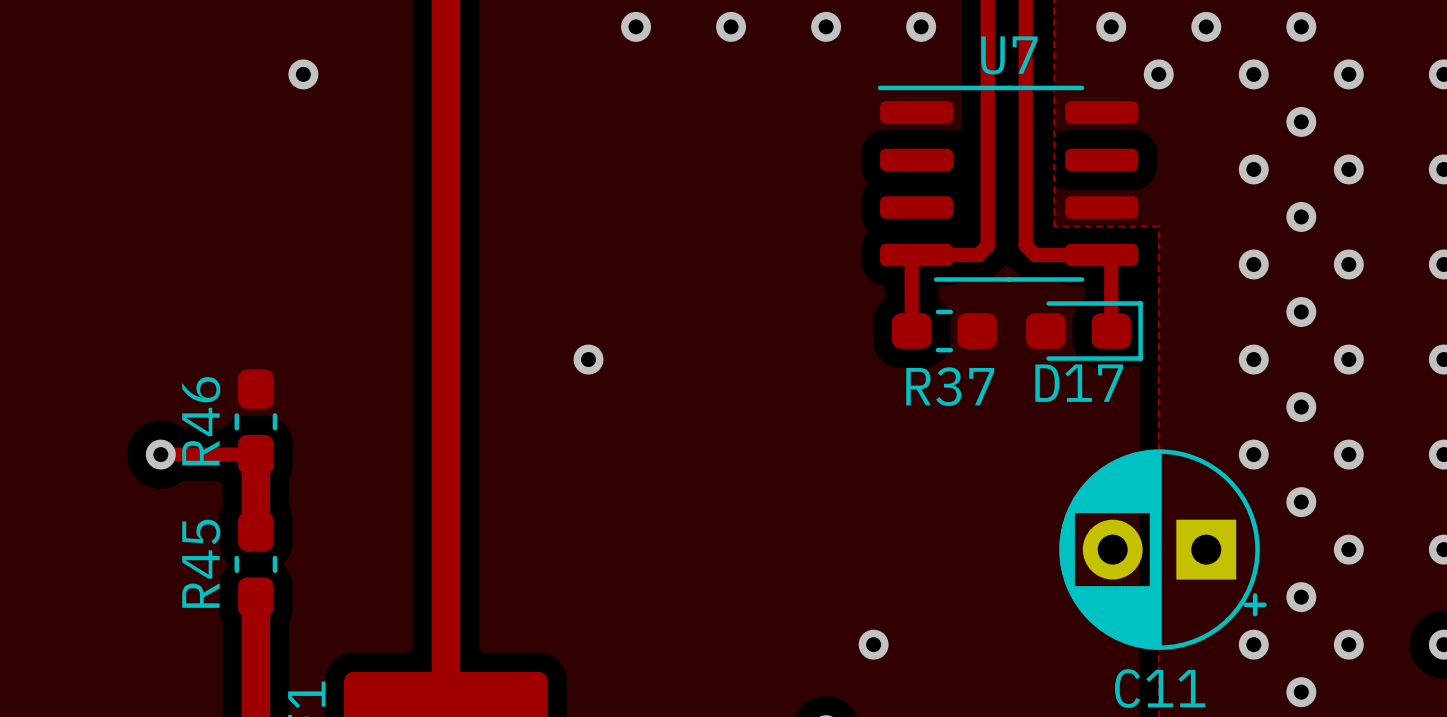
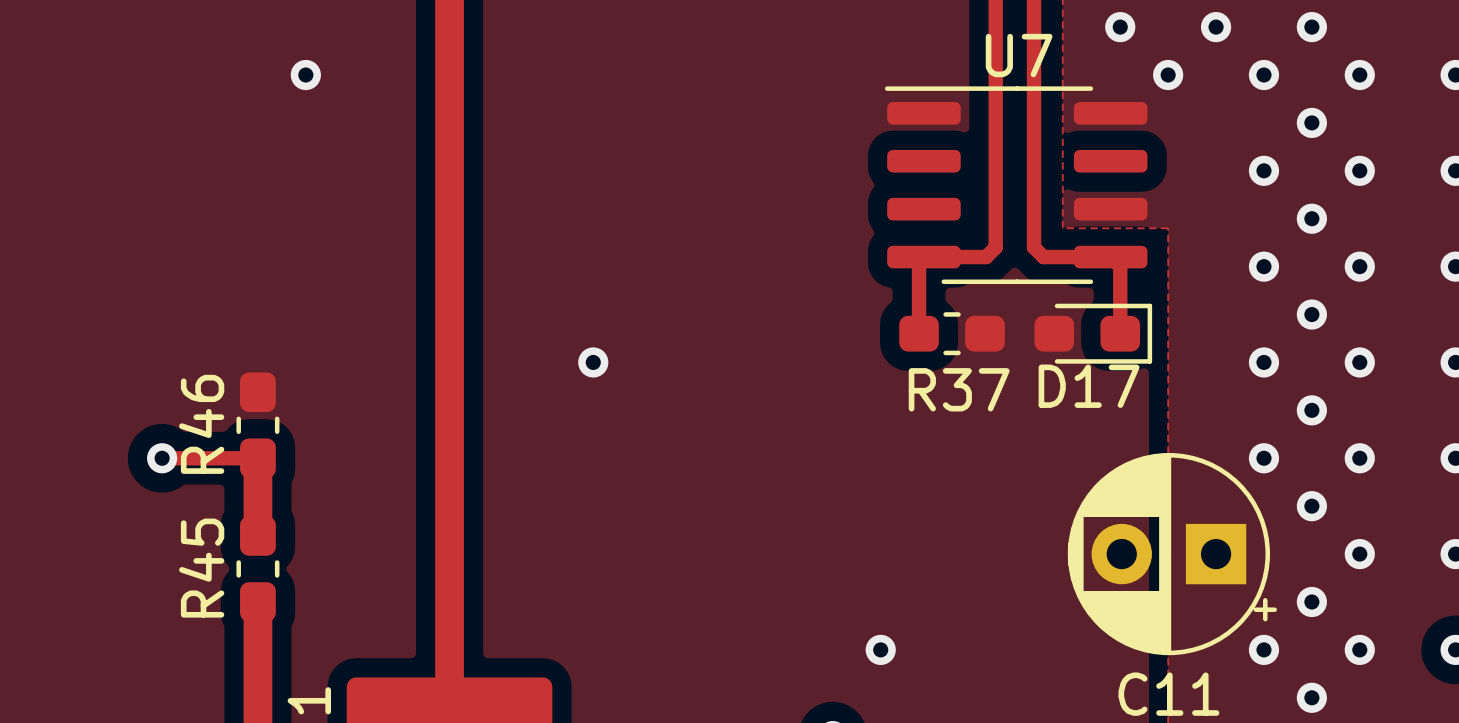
via: (636, 26) -> none
via: (731, 26) -> none
via: (826, 26) -> none
via: (921, 26) -> none

